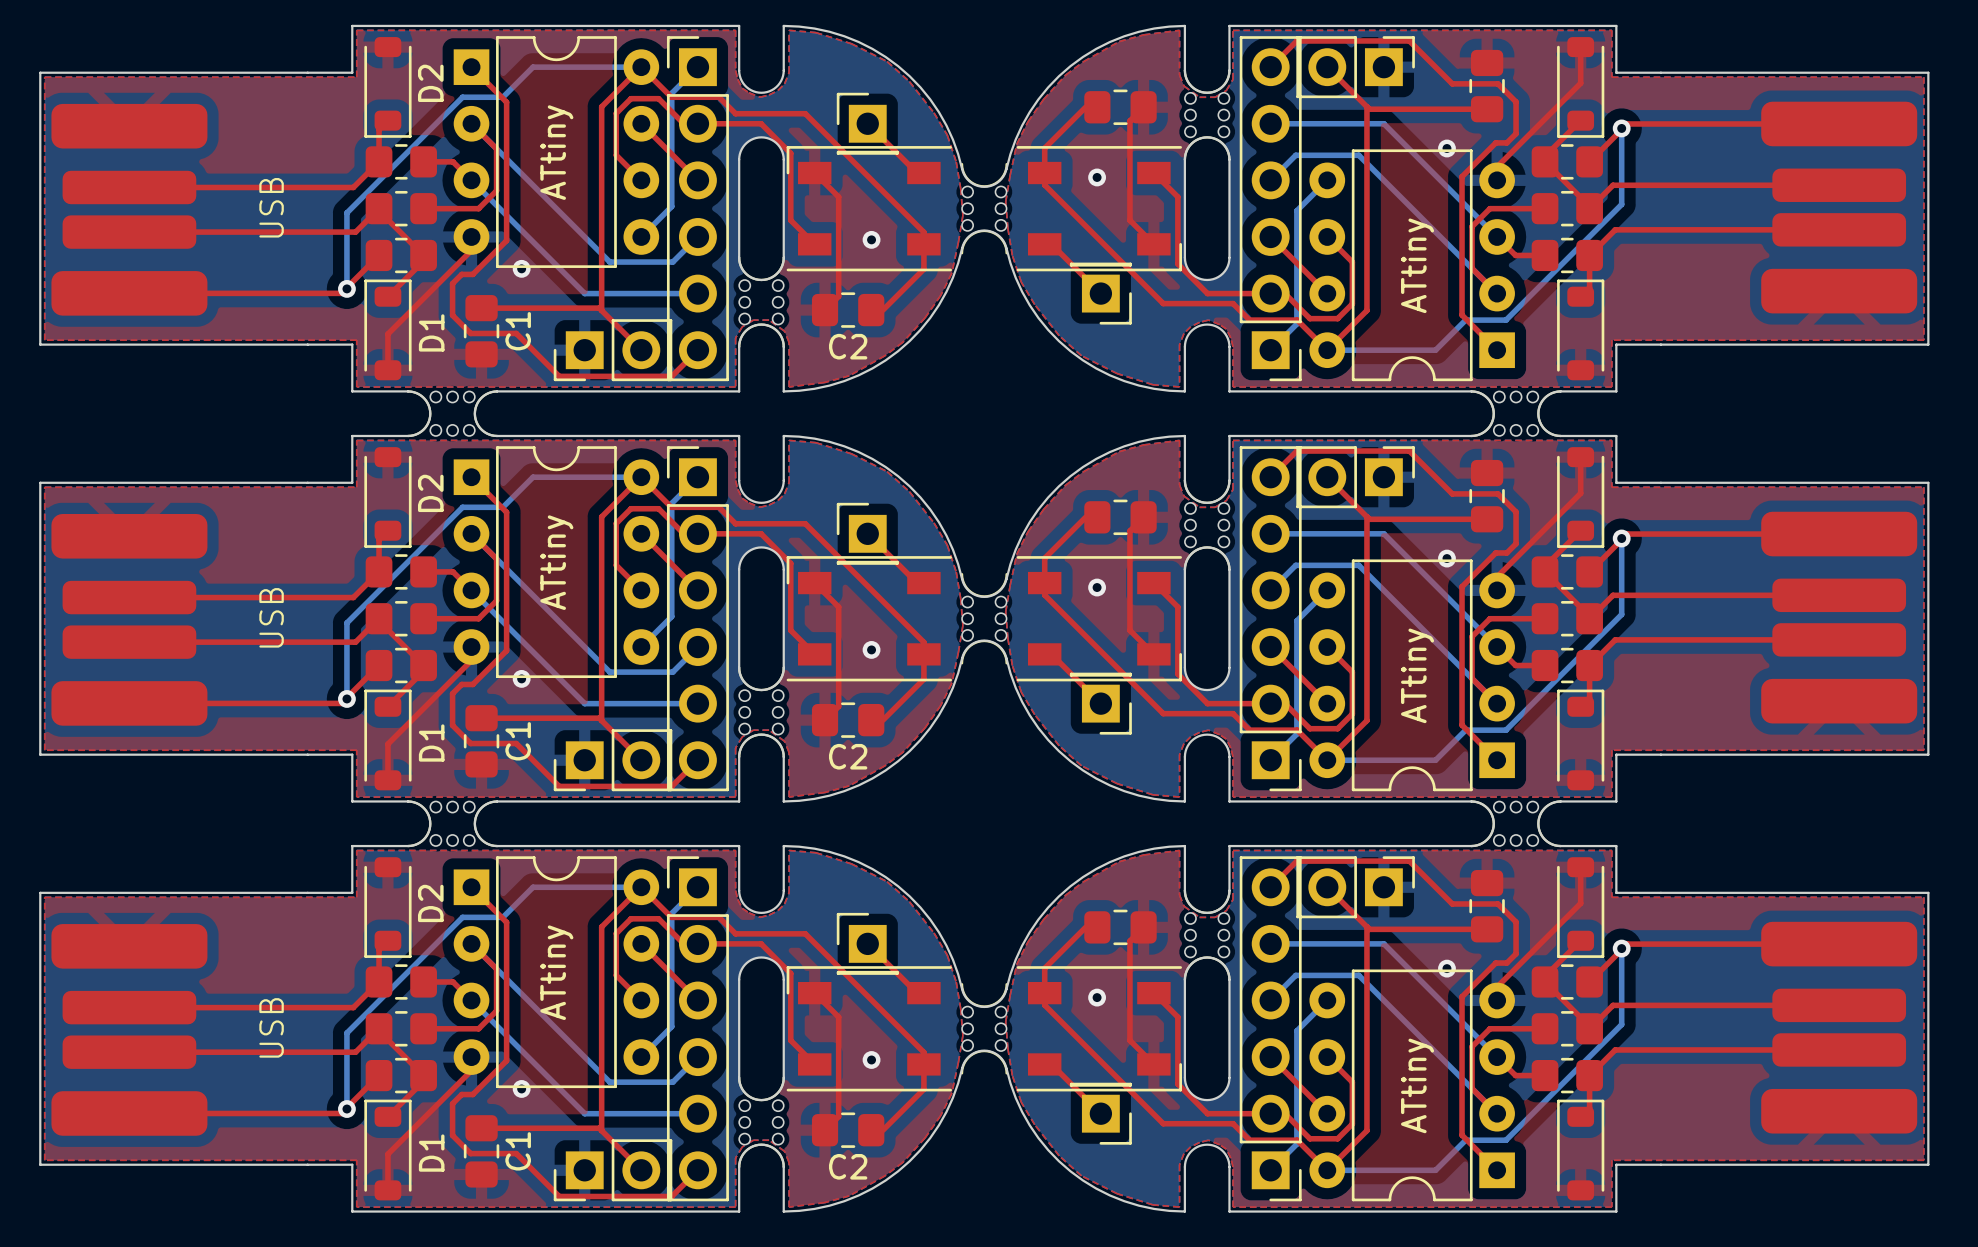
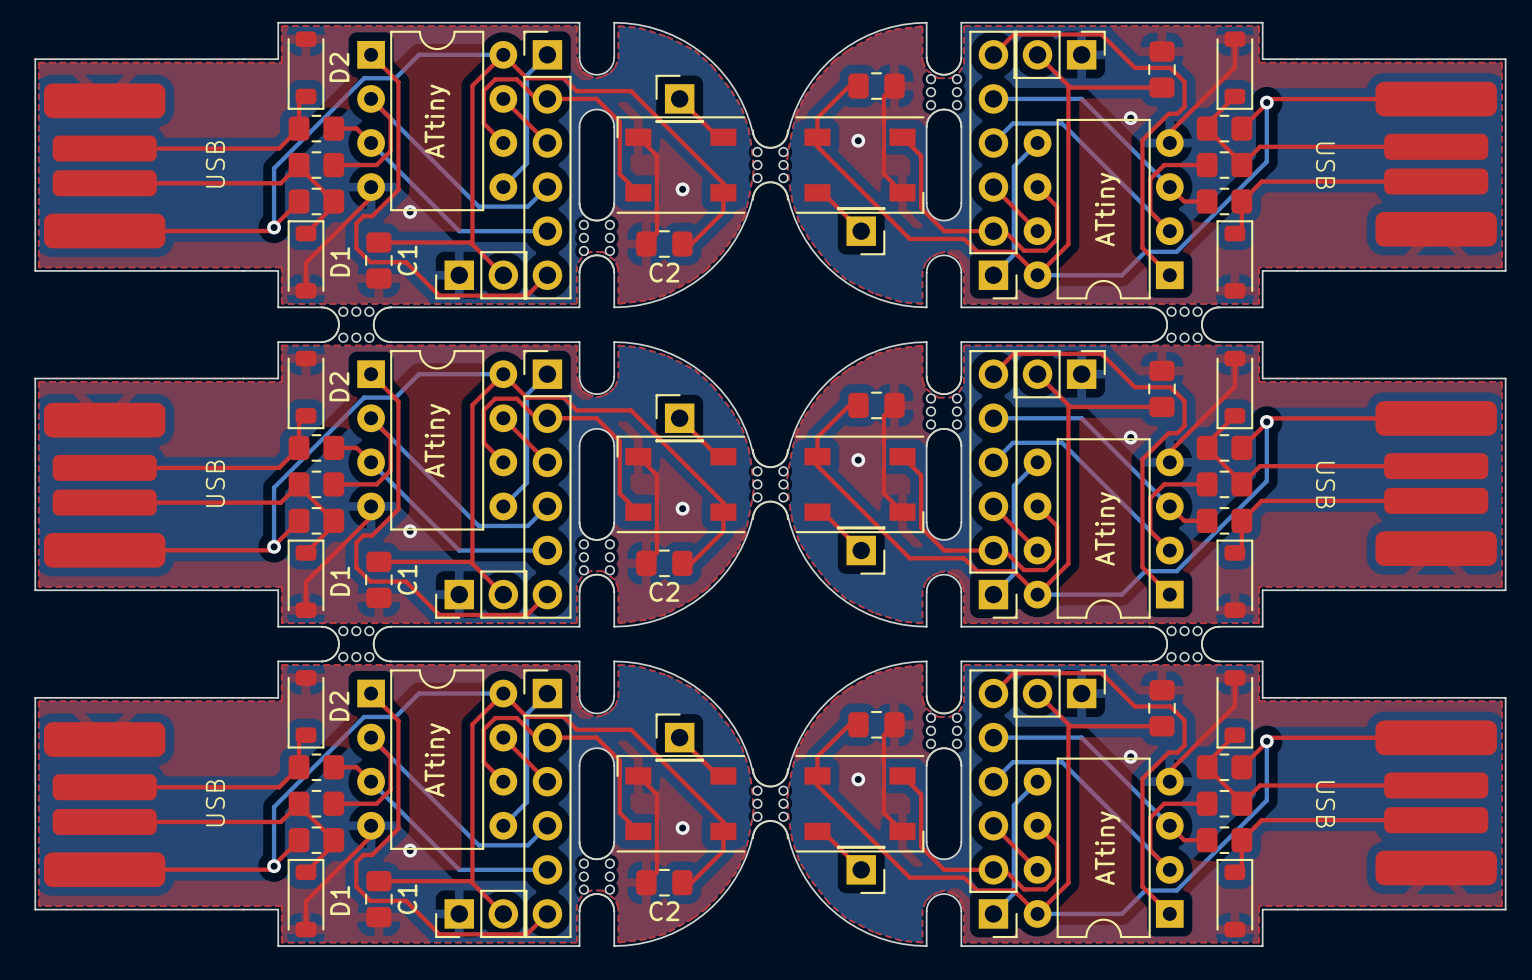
part text: none -> USB (1325, 165)
part text: none -> USB (1325, 485)
part text: none -> USB (1325, 804)

